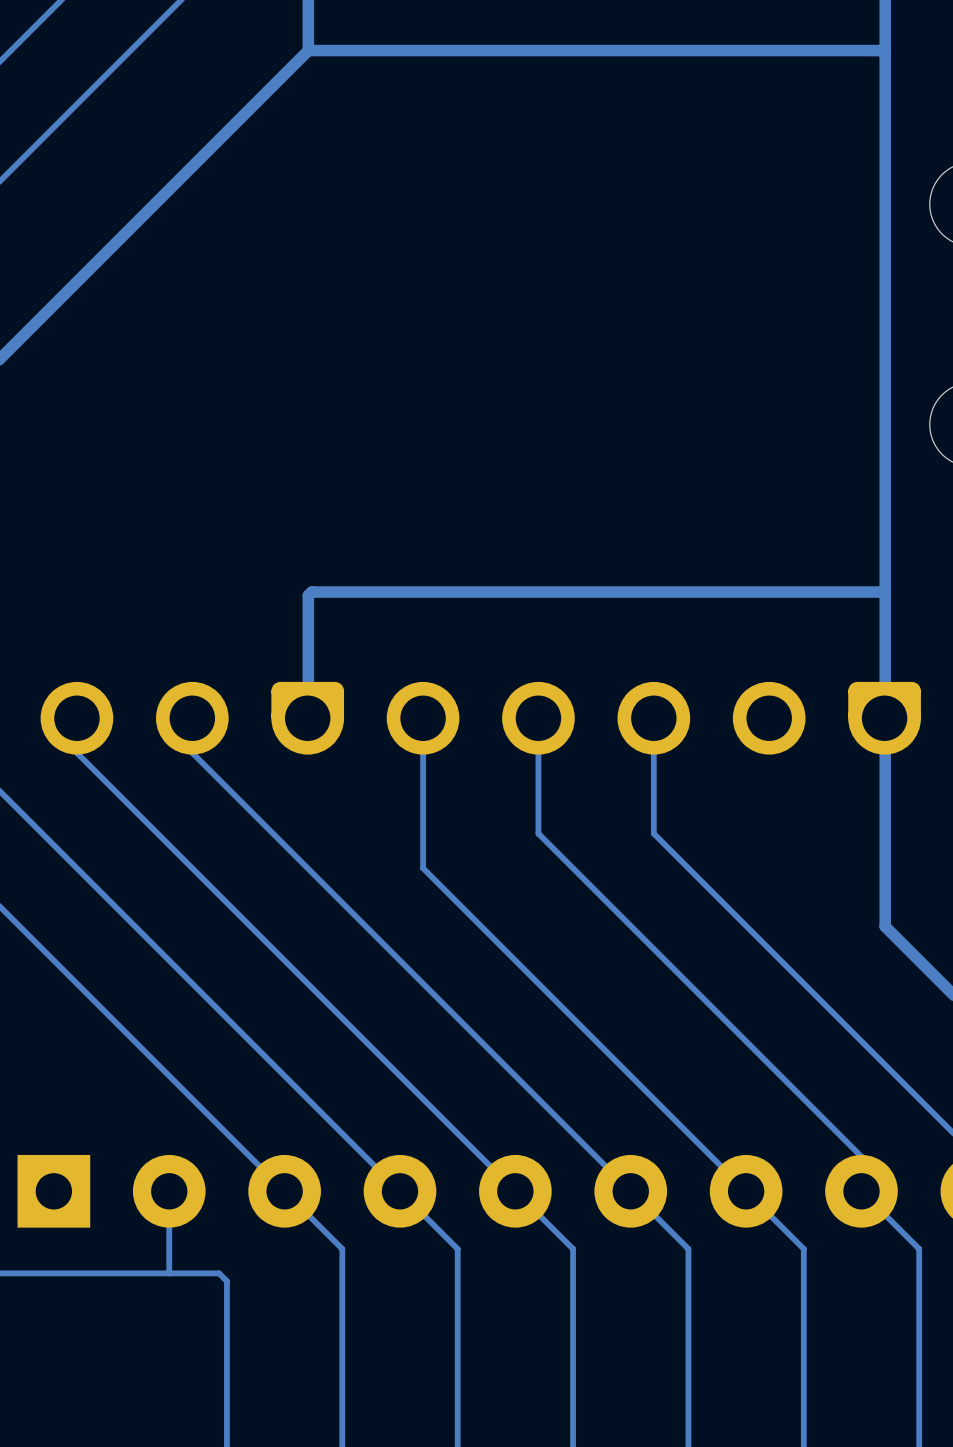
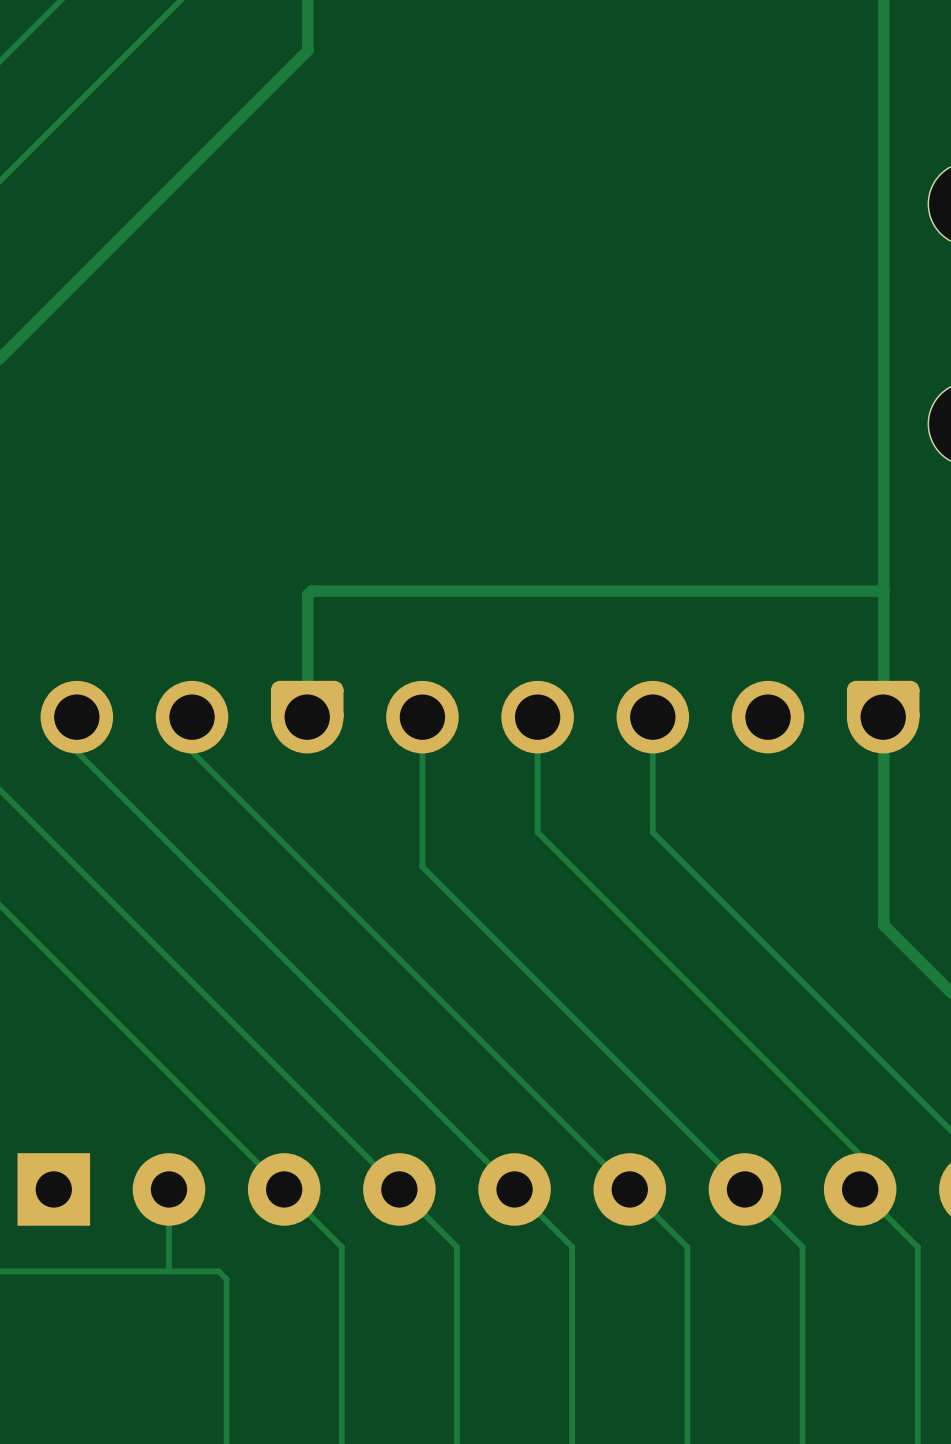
track: (885, 49) (308, 50) -> none

